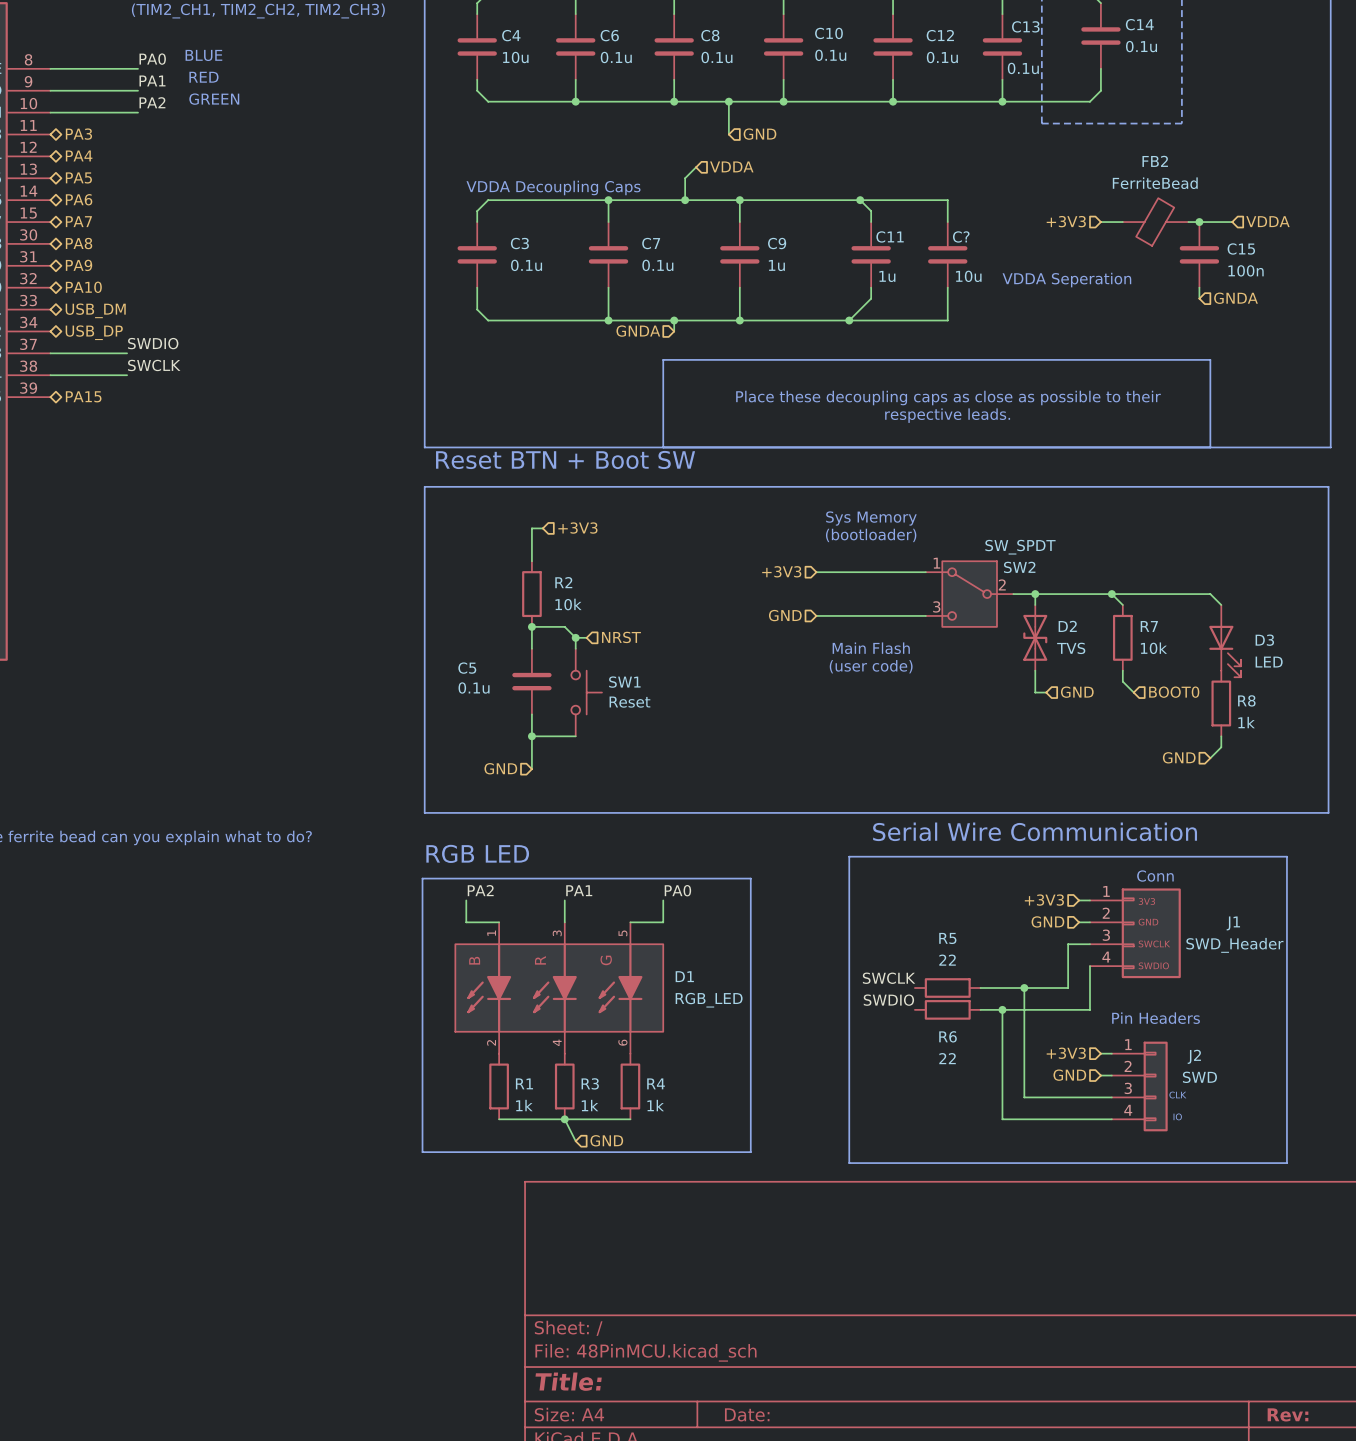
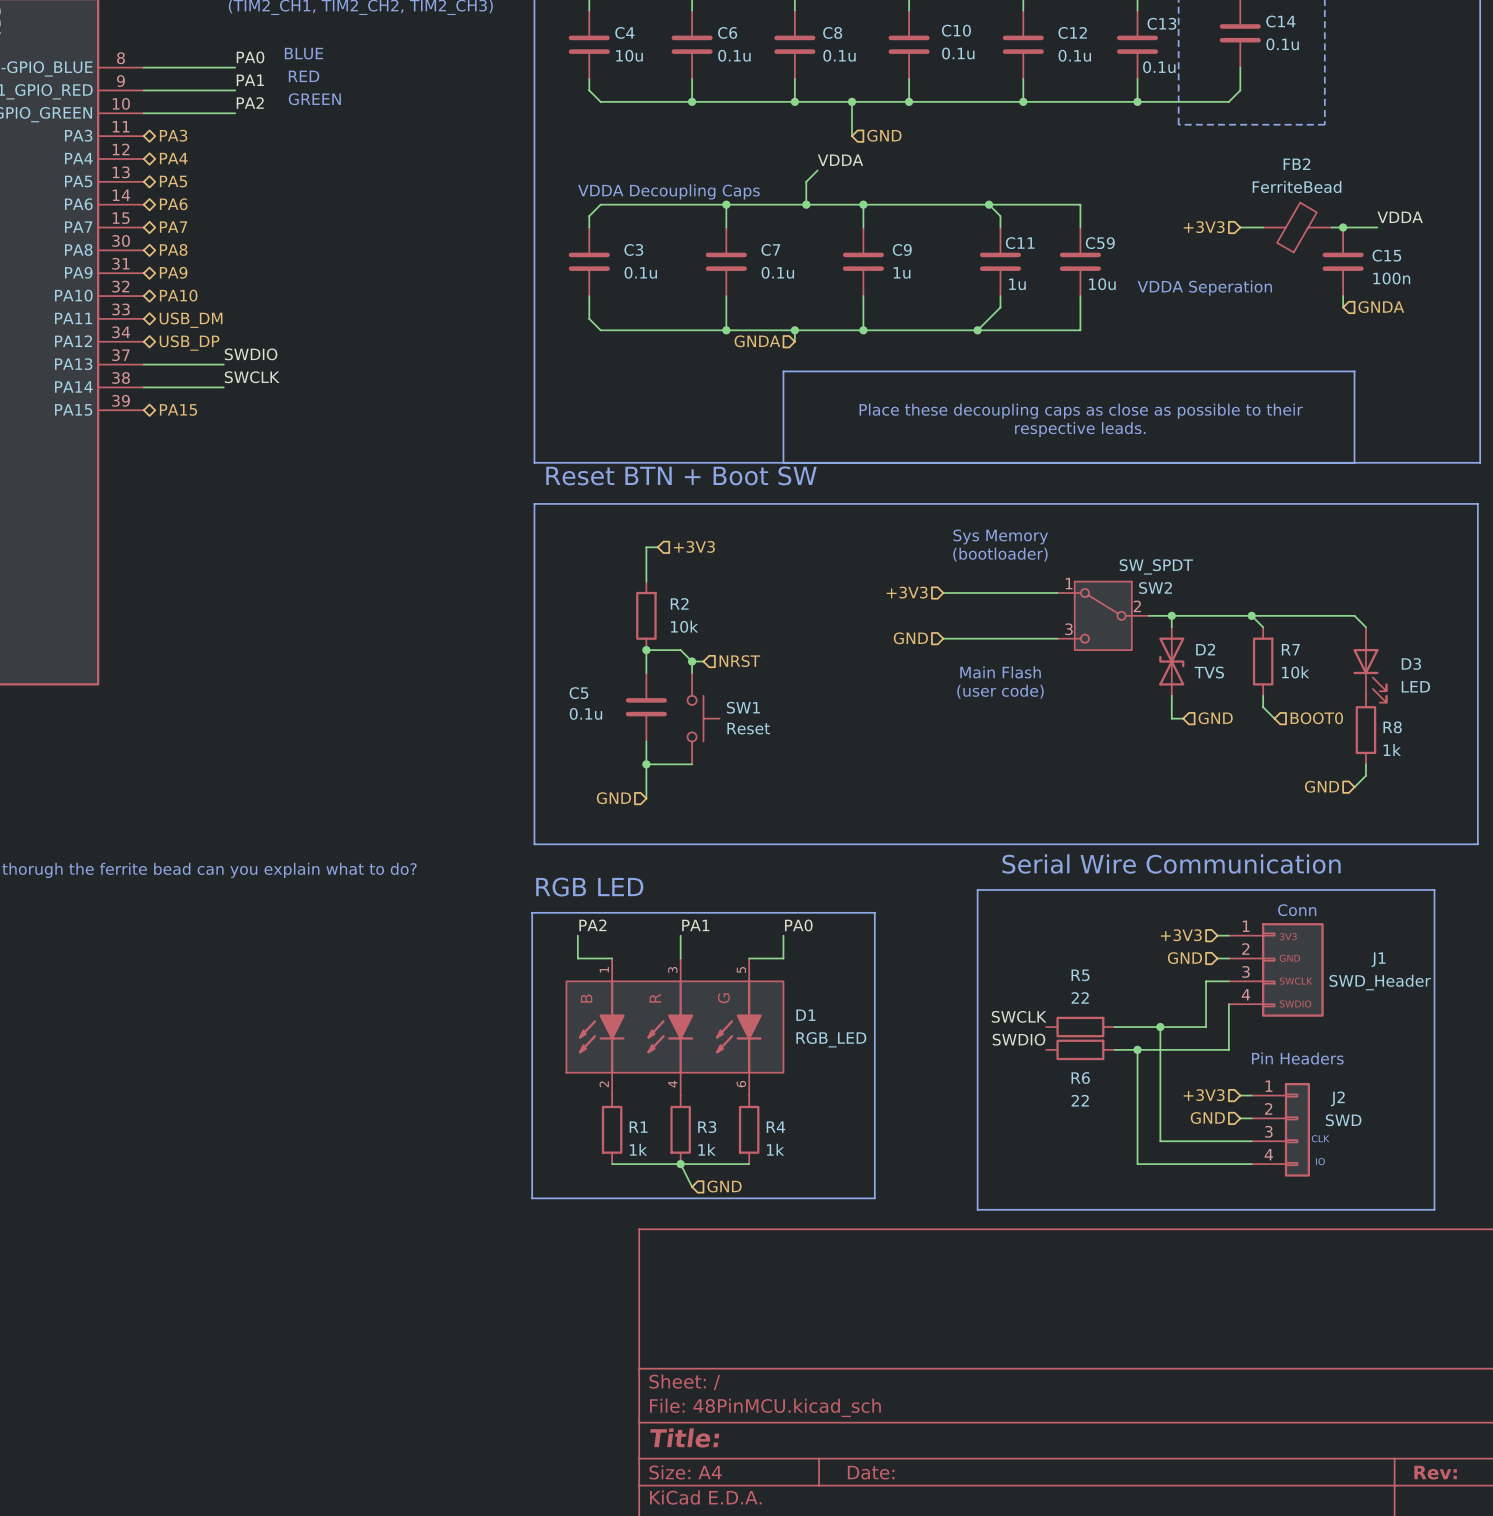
label: none -> VDDA (840, 160)
hierarchical label: VDDA (731, 166) -> none
label: none -> VDDA (1400, 217)
hierarchical label: VDDA (1267, 221) -> none
C? name: C? (961, 236) -> C59 (1100, 243)

